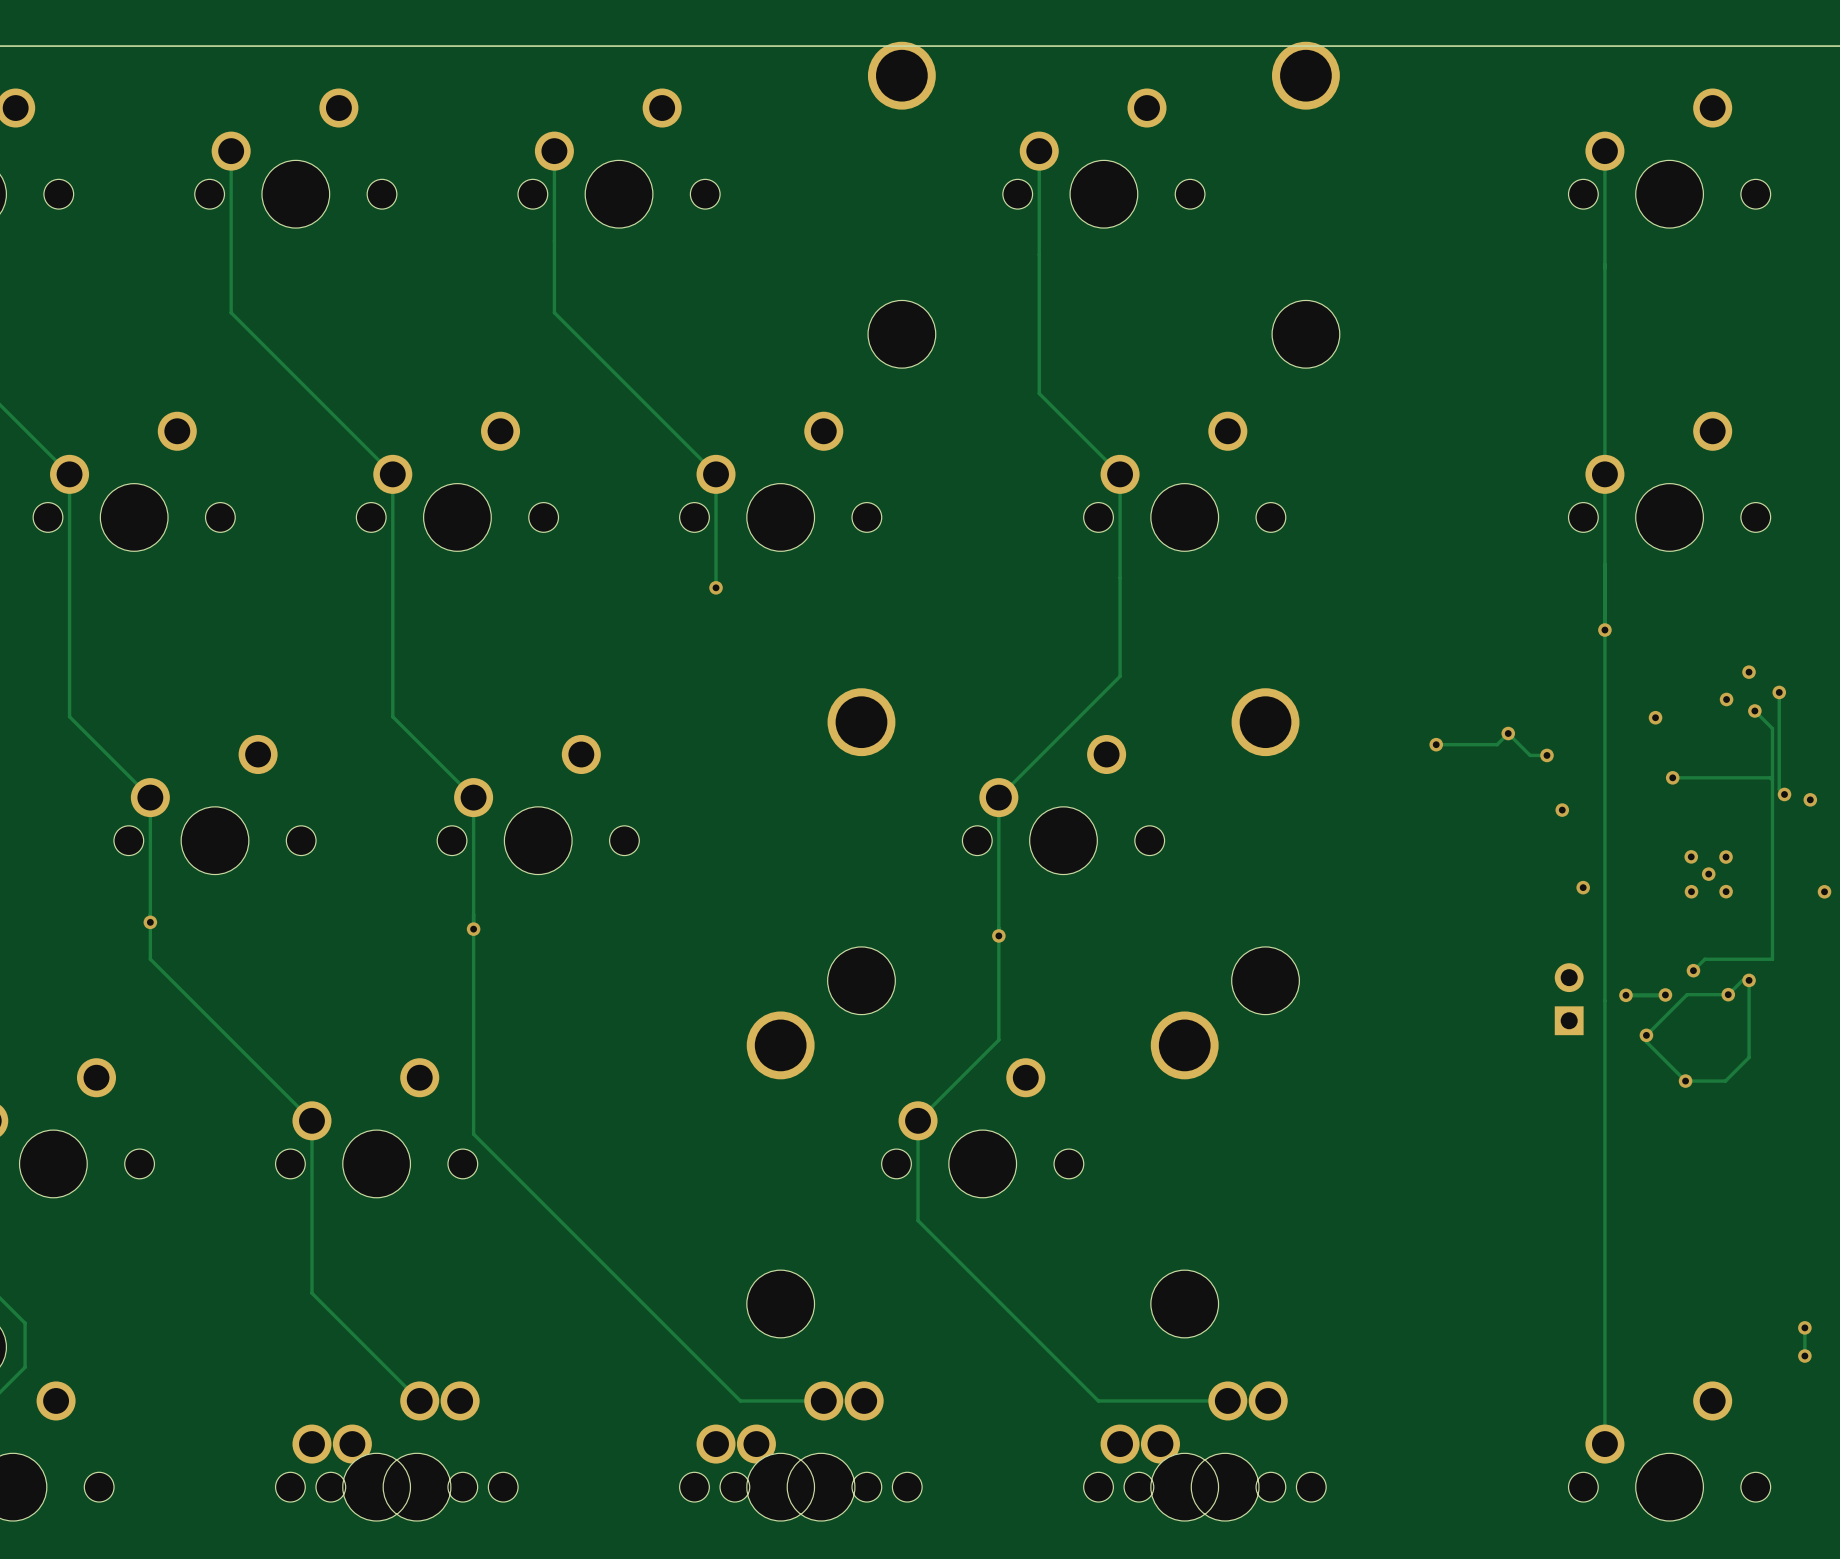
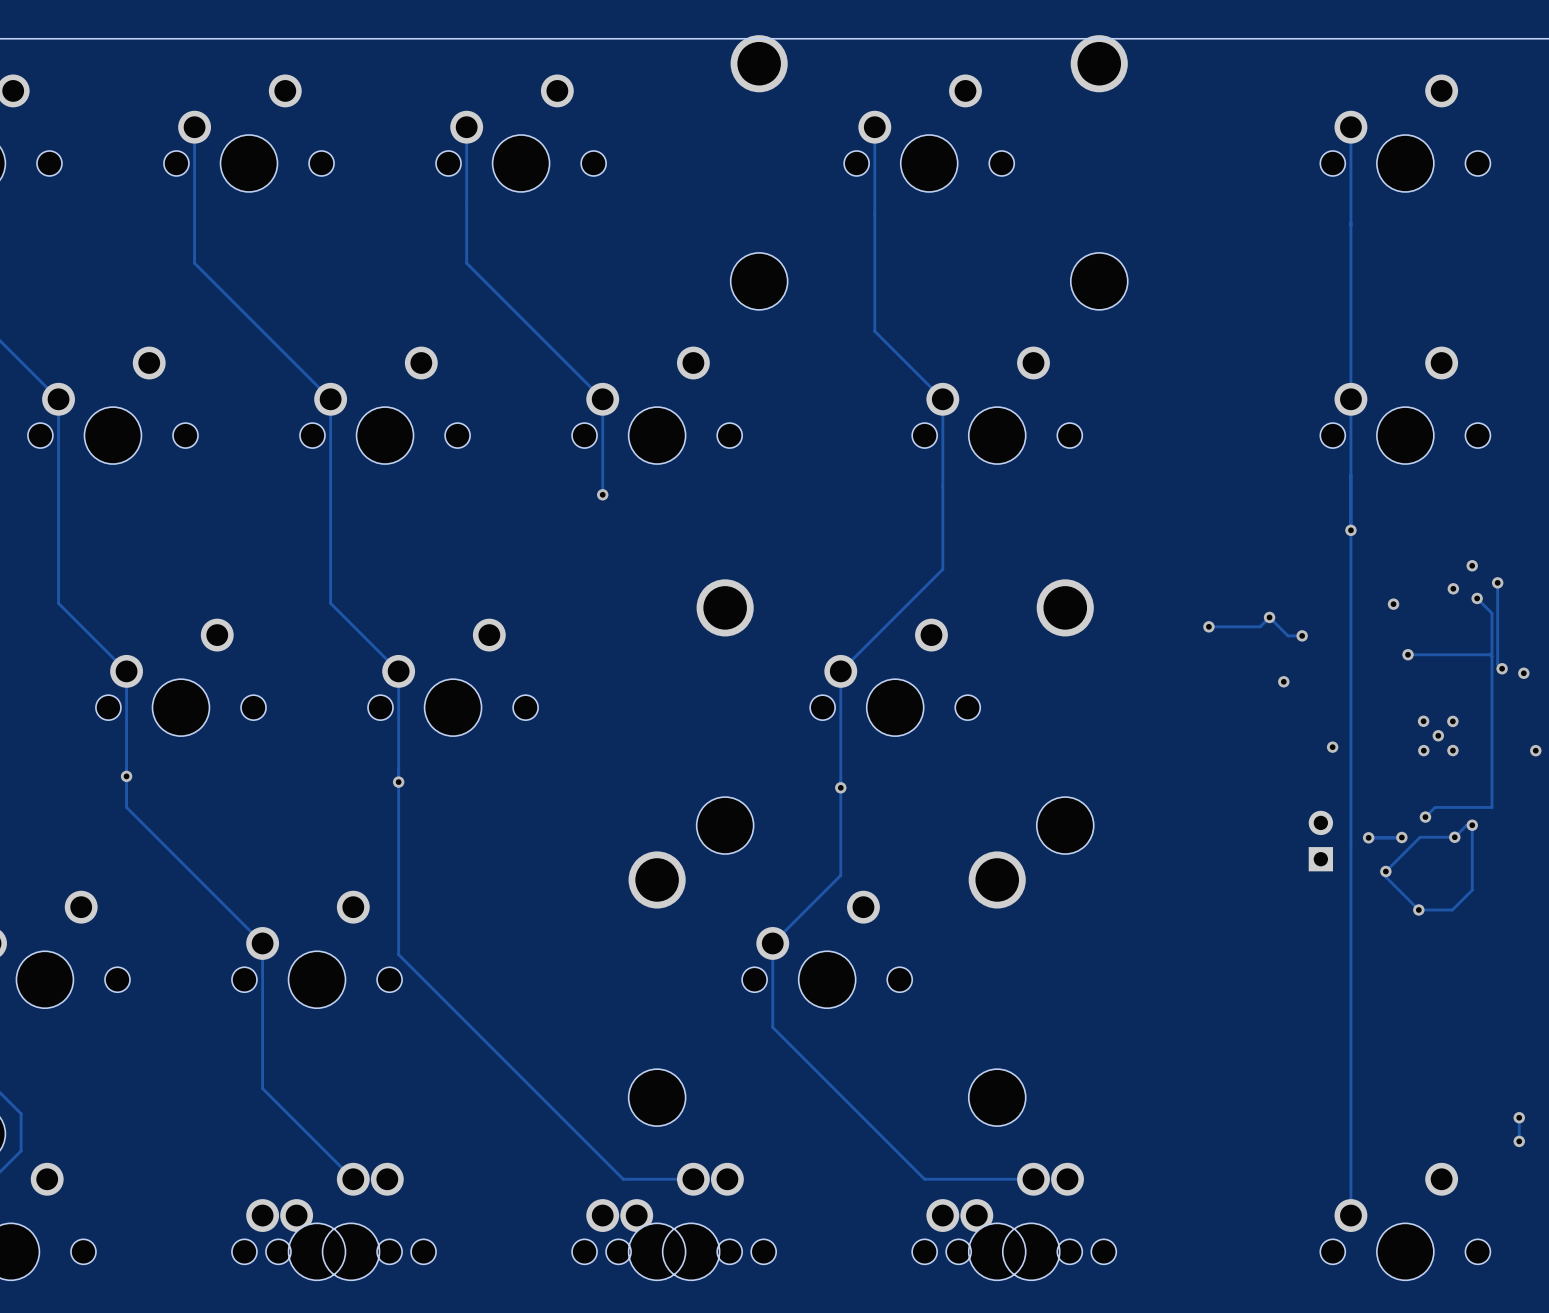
via position: (1562, 810) -> (1283, 681)

